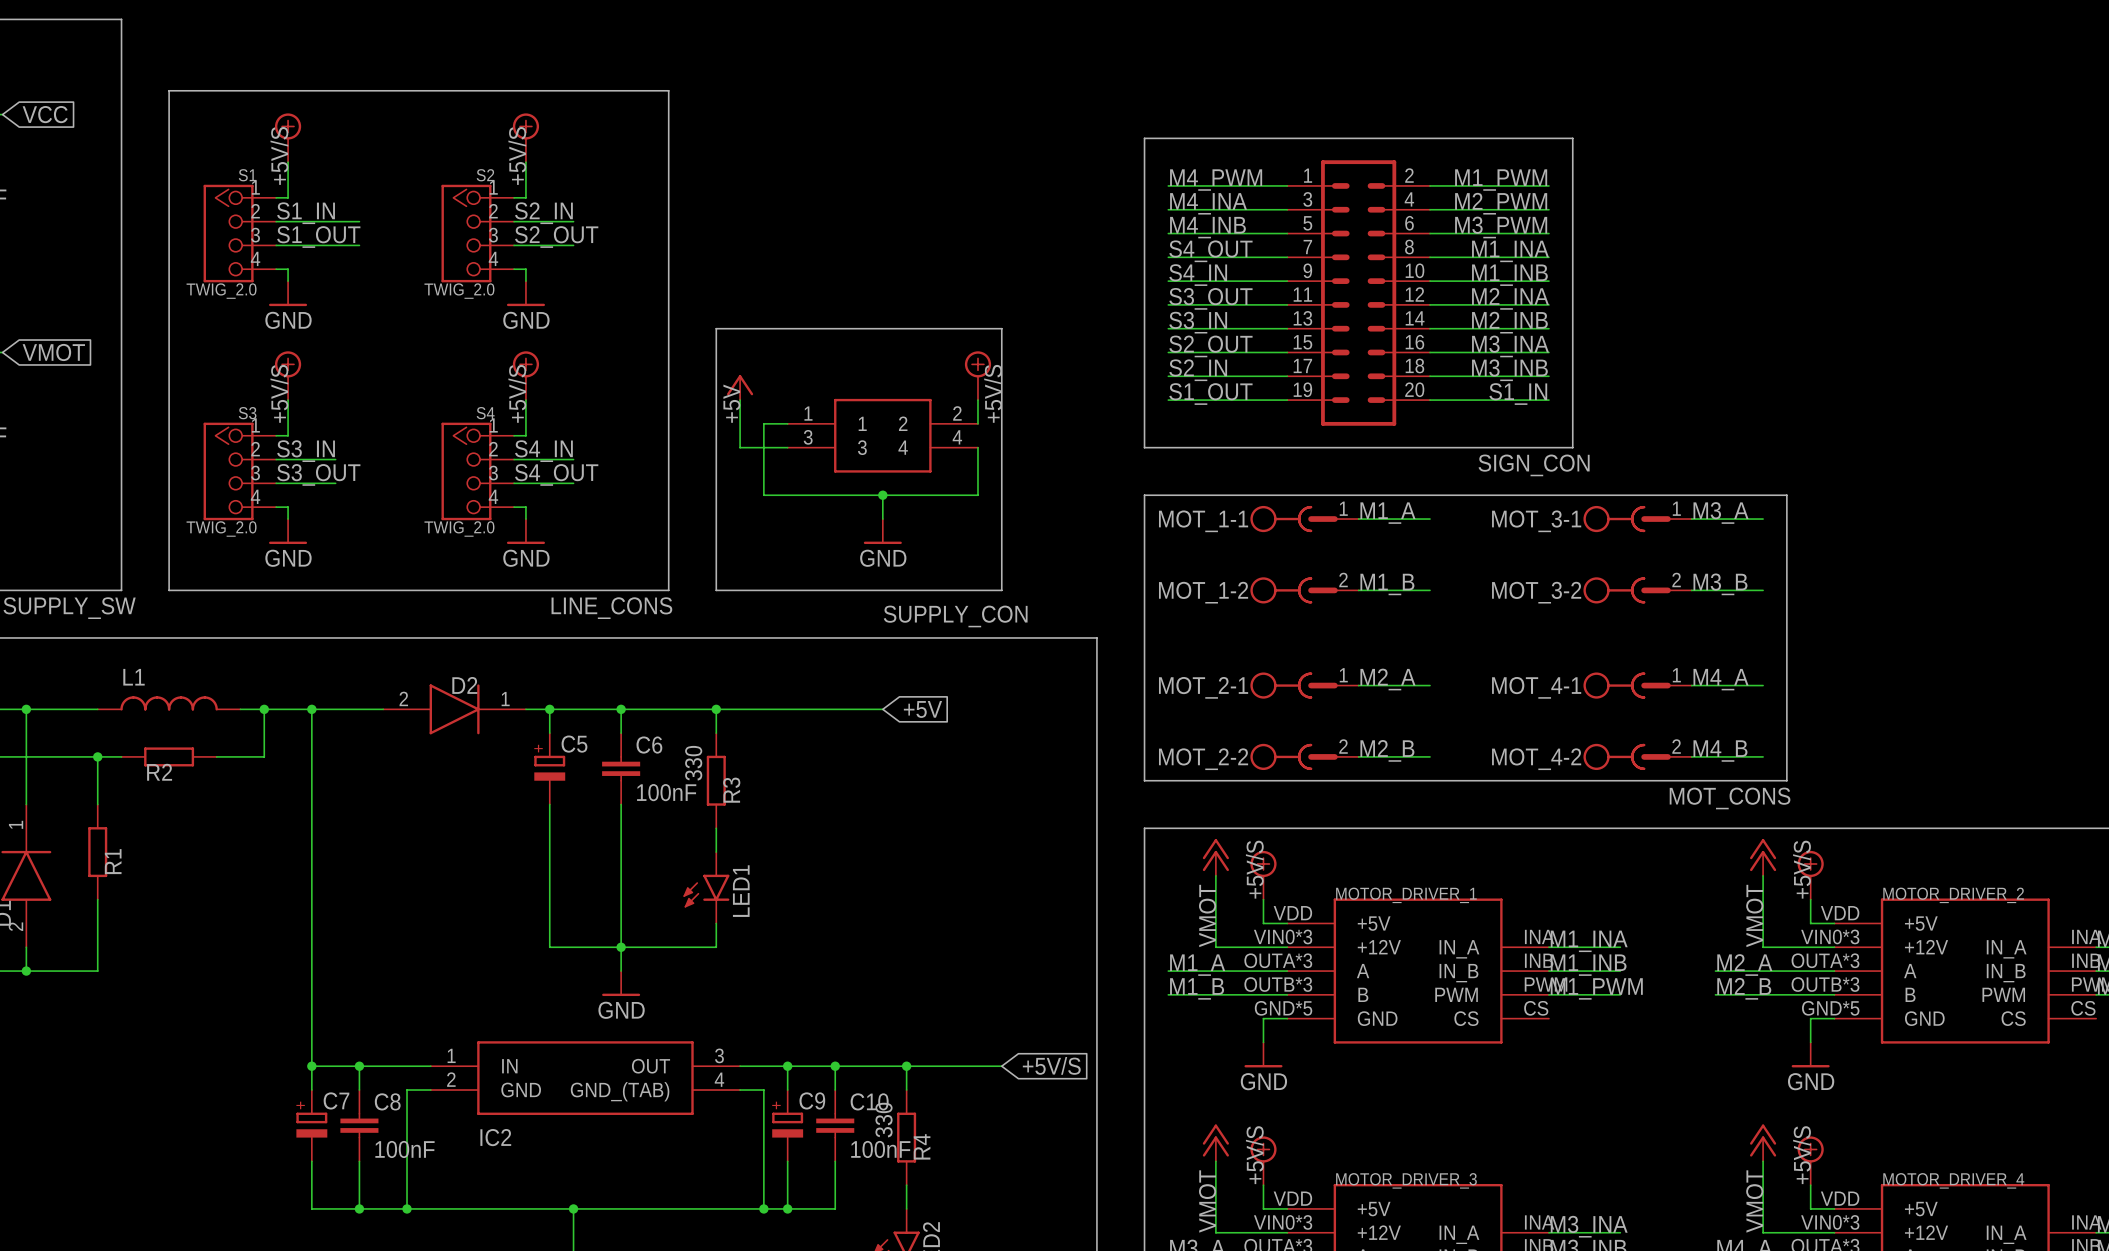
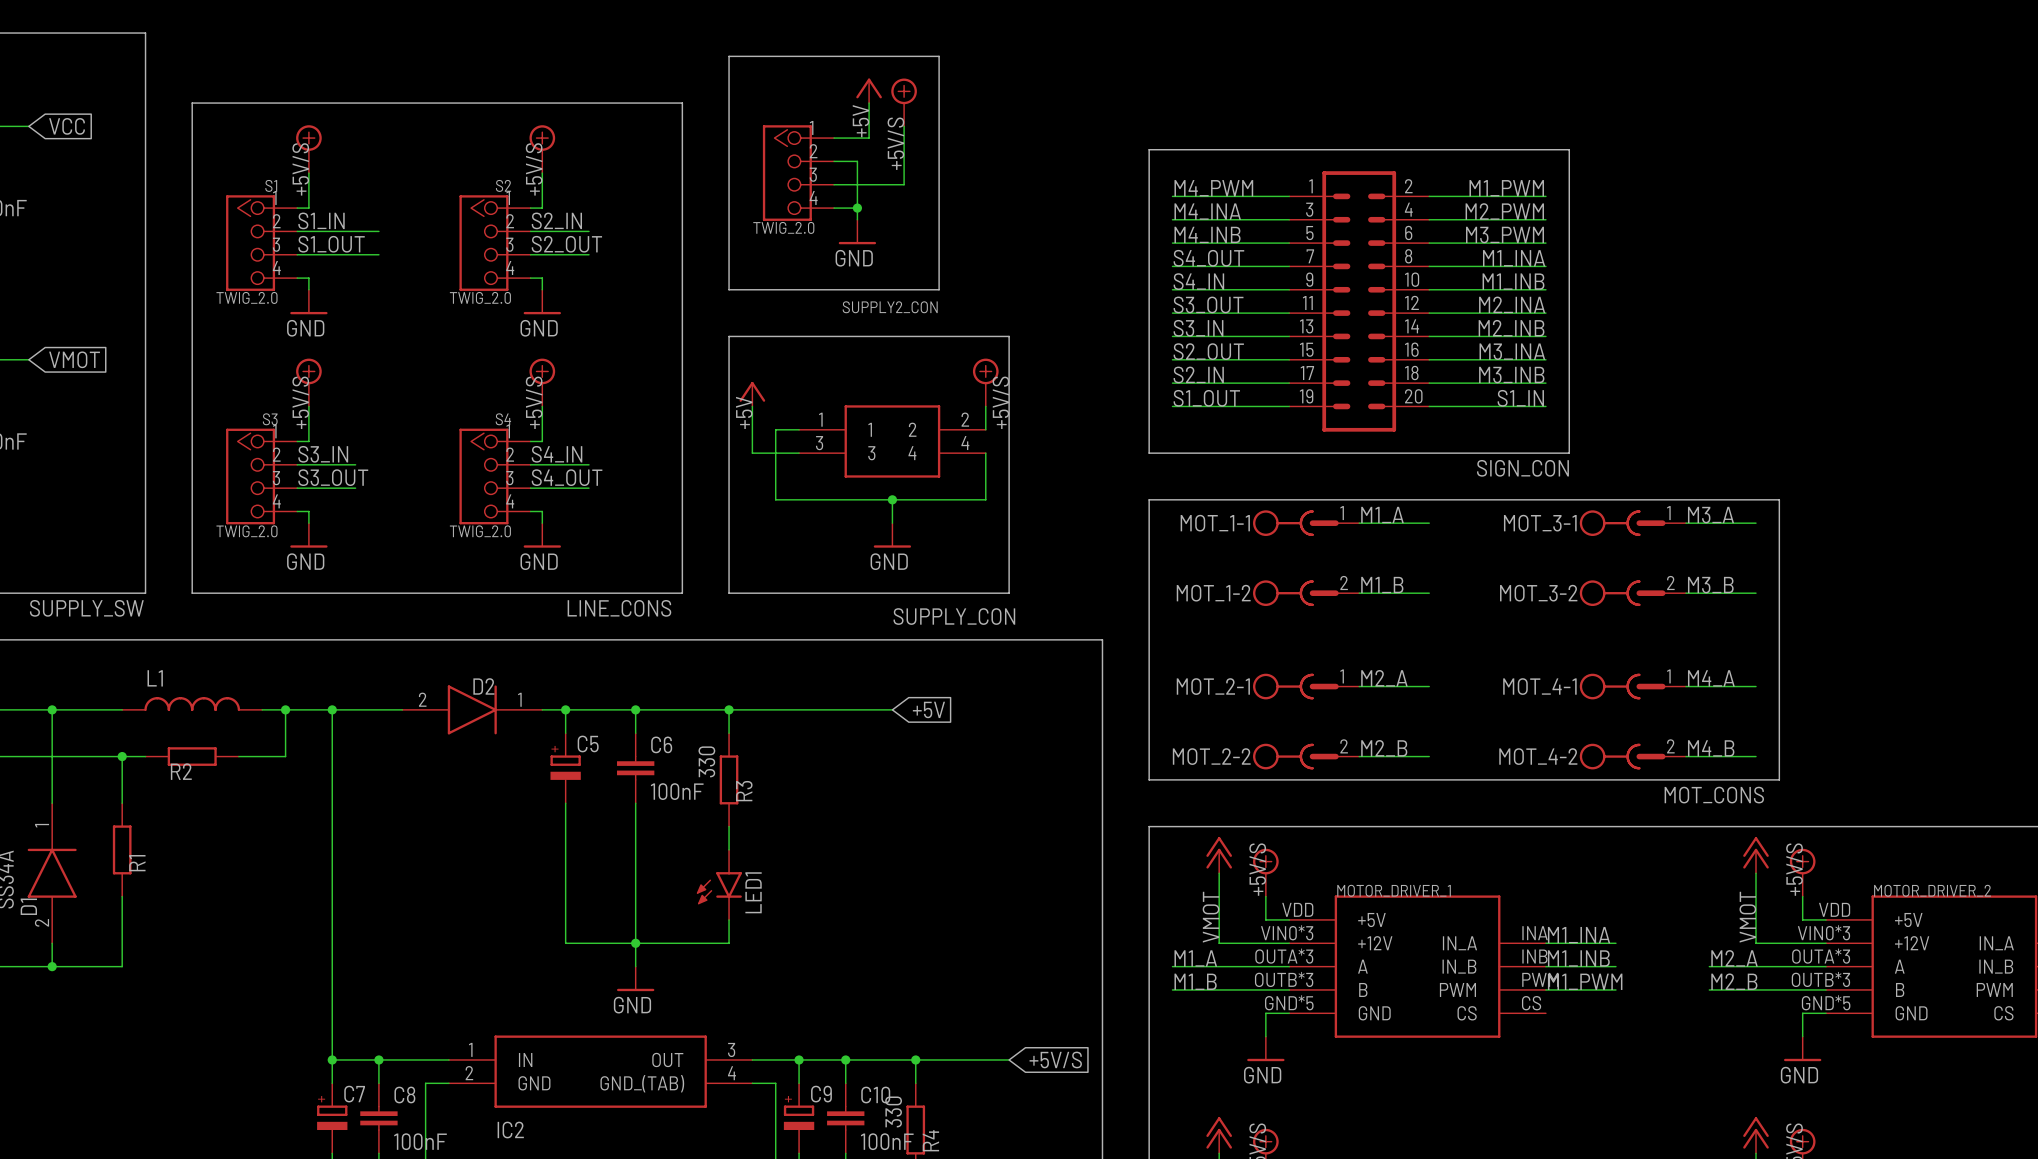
line: none -> (729, 56) (939, 56) (939, 289) (729, 289) (729, 56)
power symbol: none -> +5V (869, 90)
wire: none -> (869, 103) (869, 138) (834, 138)
power symbol: none -> (904, 102)
wire: none -> (904, 126) (904, 184) (834, 184)
label: none -> +5V/S (895, 143)
wire: none -> (834, 161) (857, 161) (857, 219)
SUPPLY2_CON: none -> TWIG_2.0 (798, 173)
wire: none -> (834, 208) (857, 208)
junction: none -> (857, 208)
power symbol: none -> GND (857, 232)

